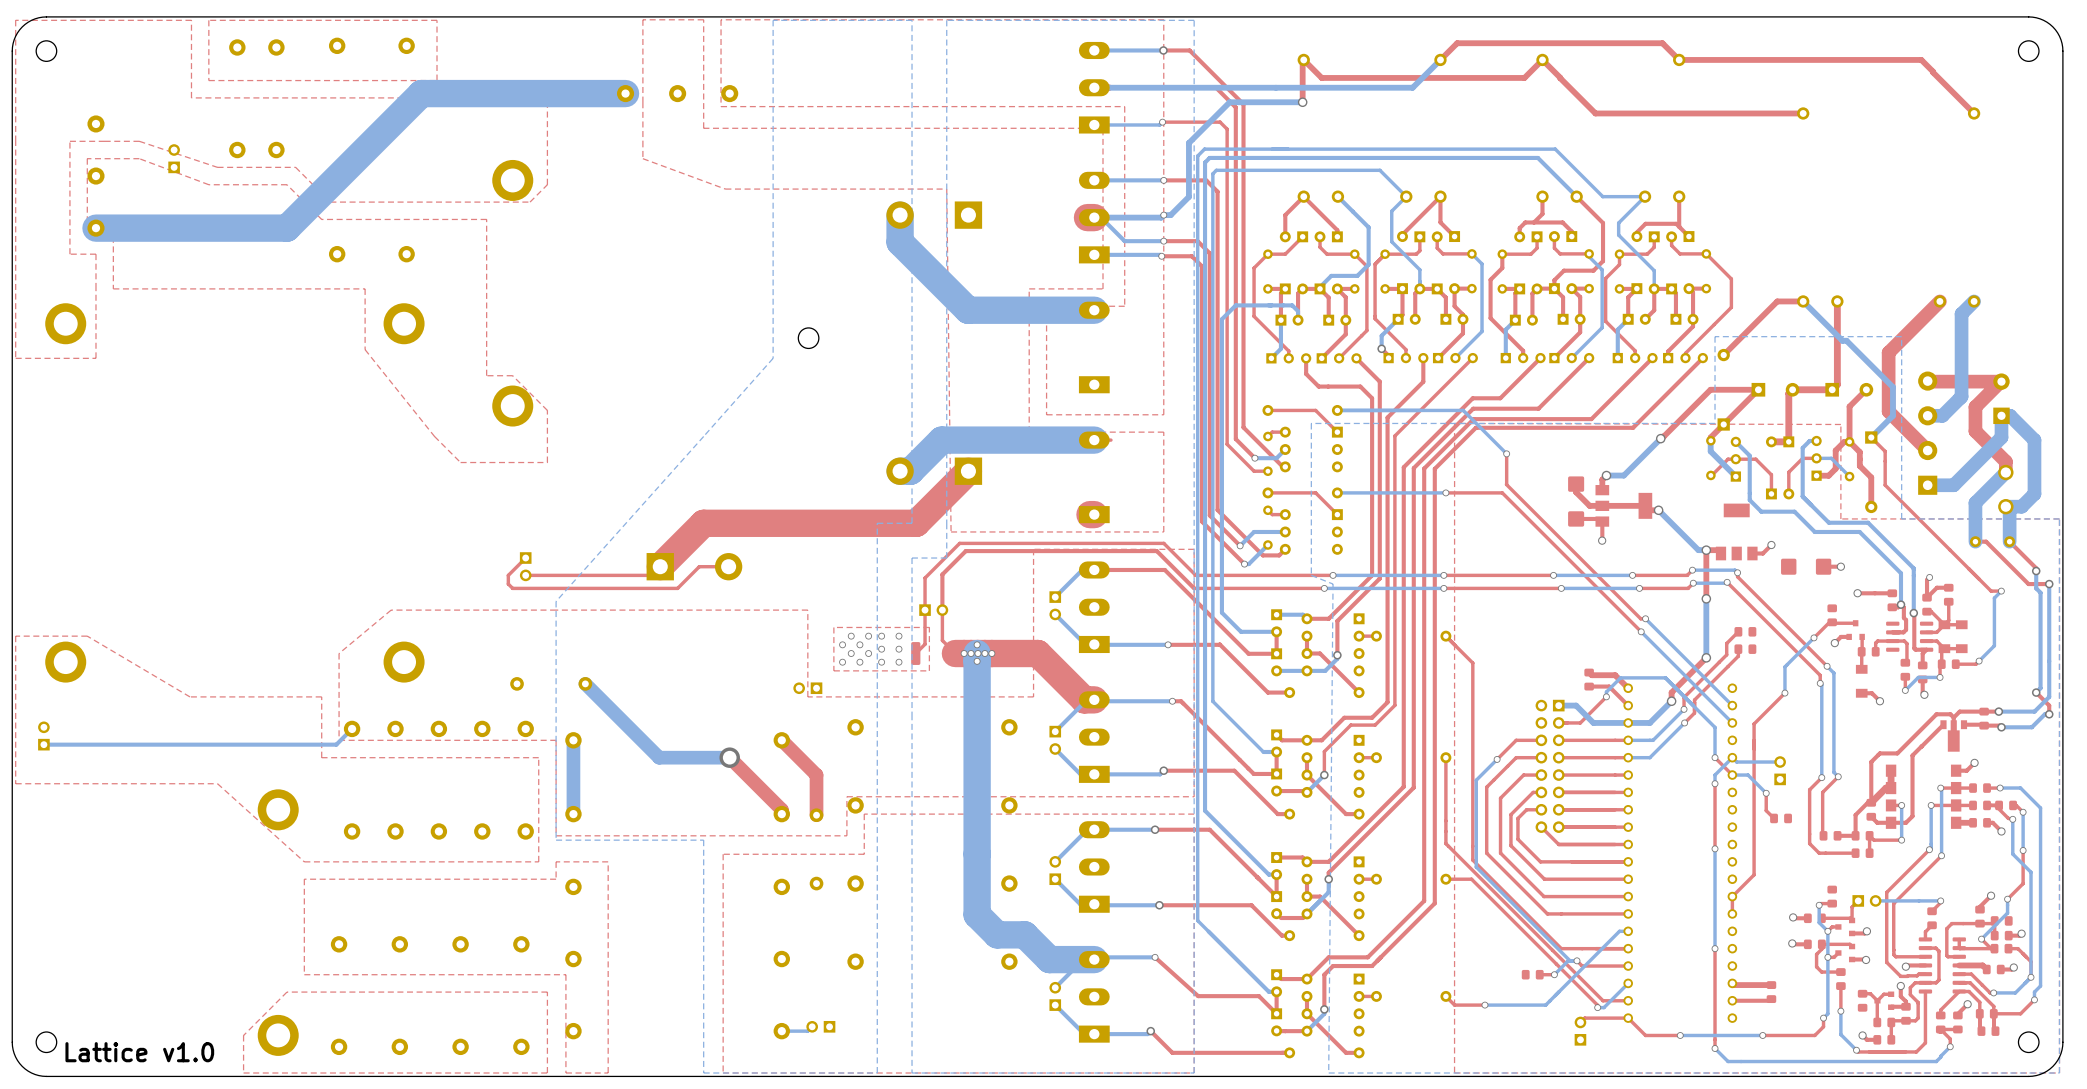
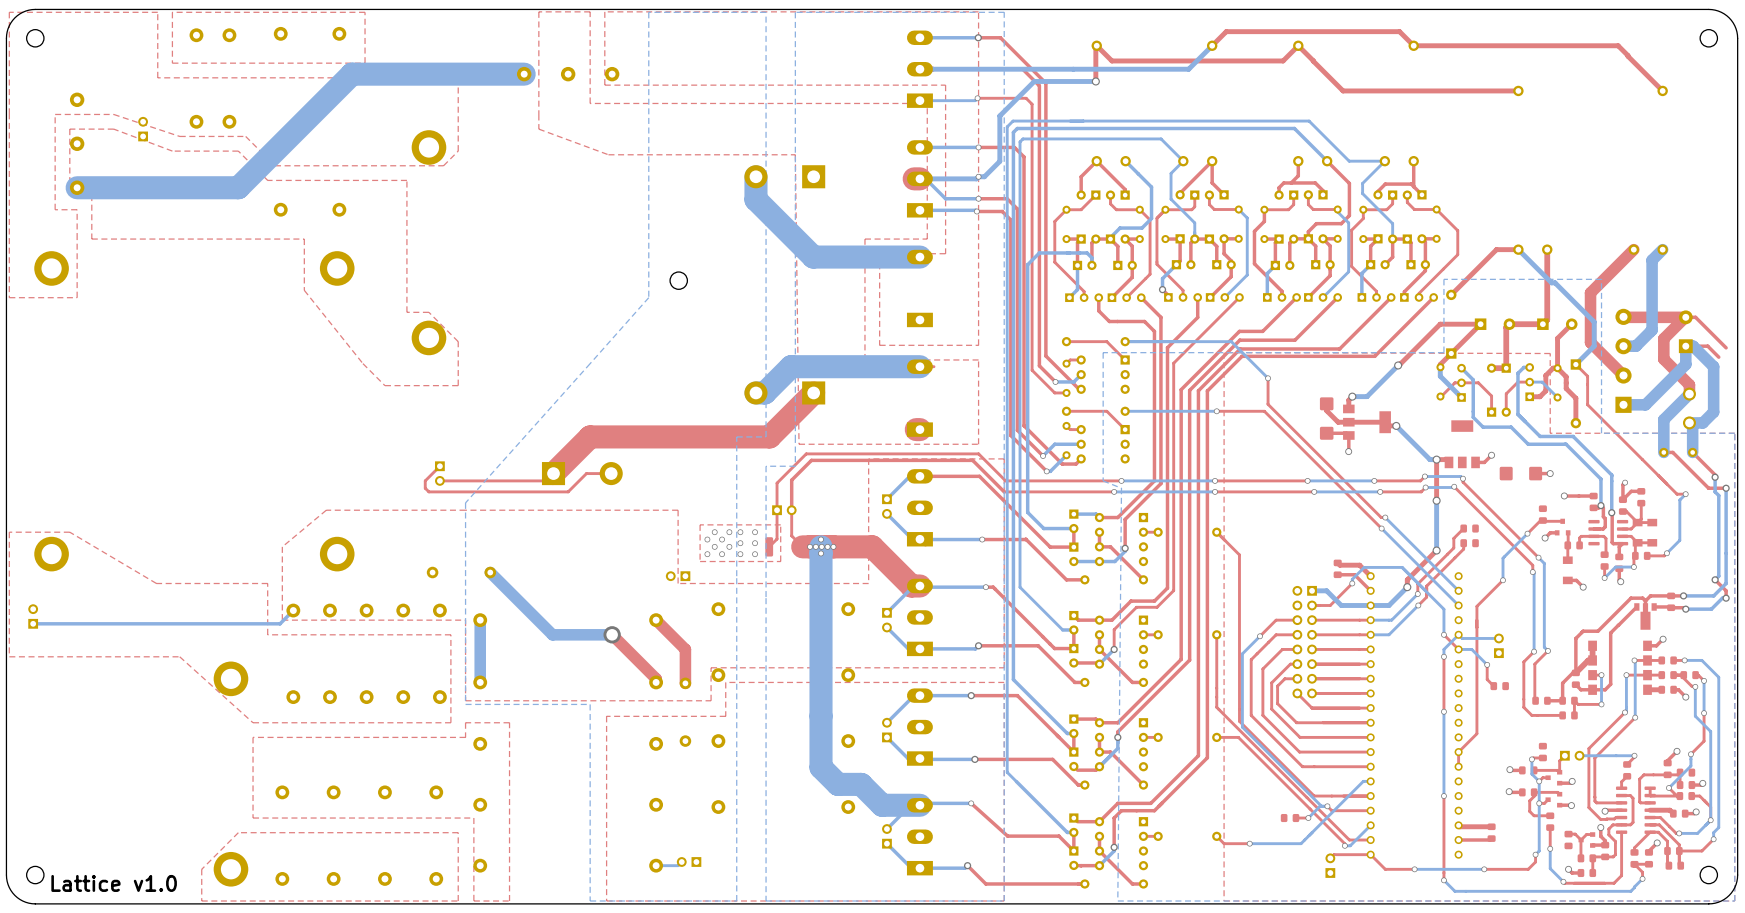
top track: none -> (1685, 317) (1695, 317) (1726, 347)
top track: none -> (1685, 346) (1707, 346) (1718, 357)

